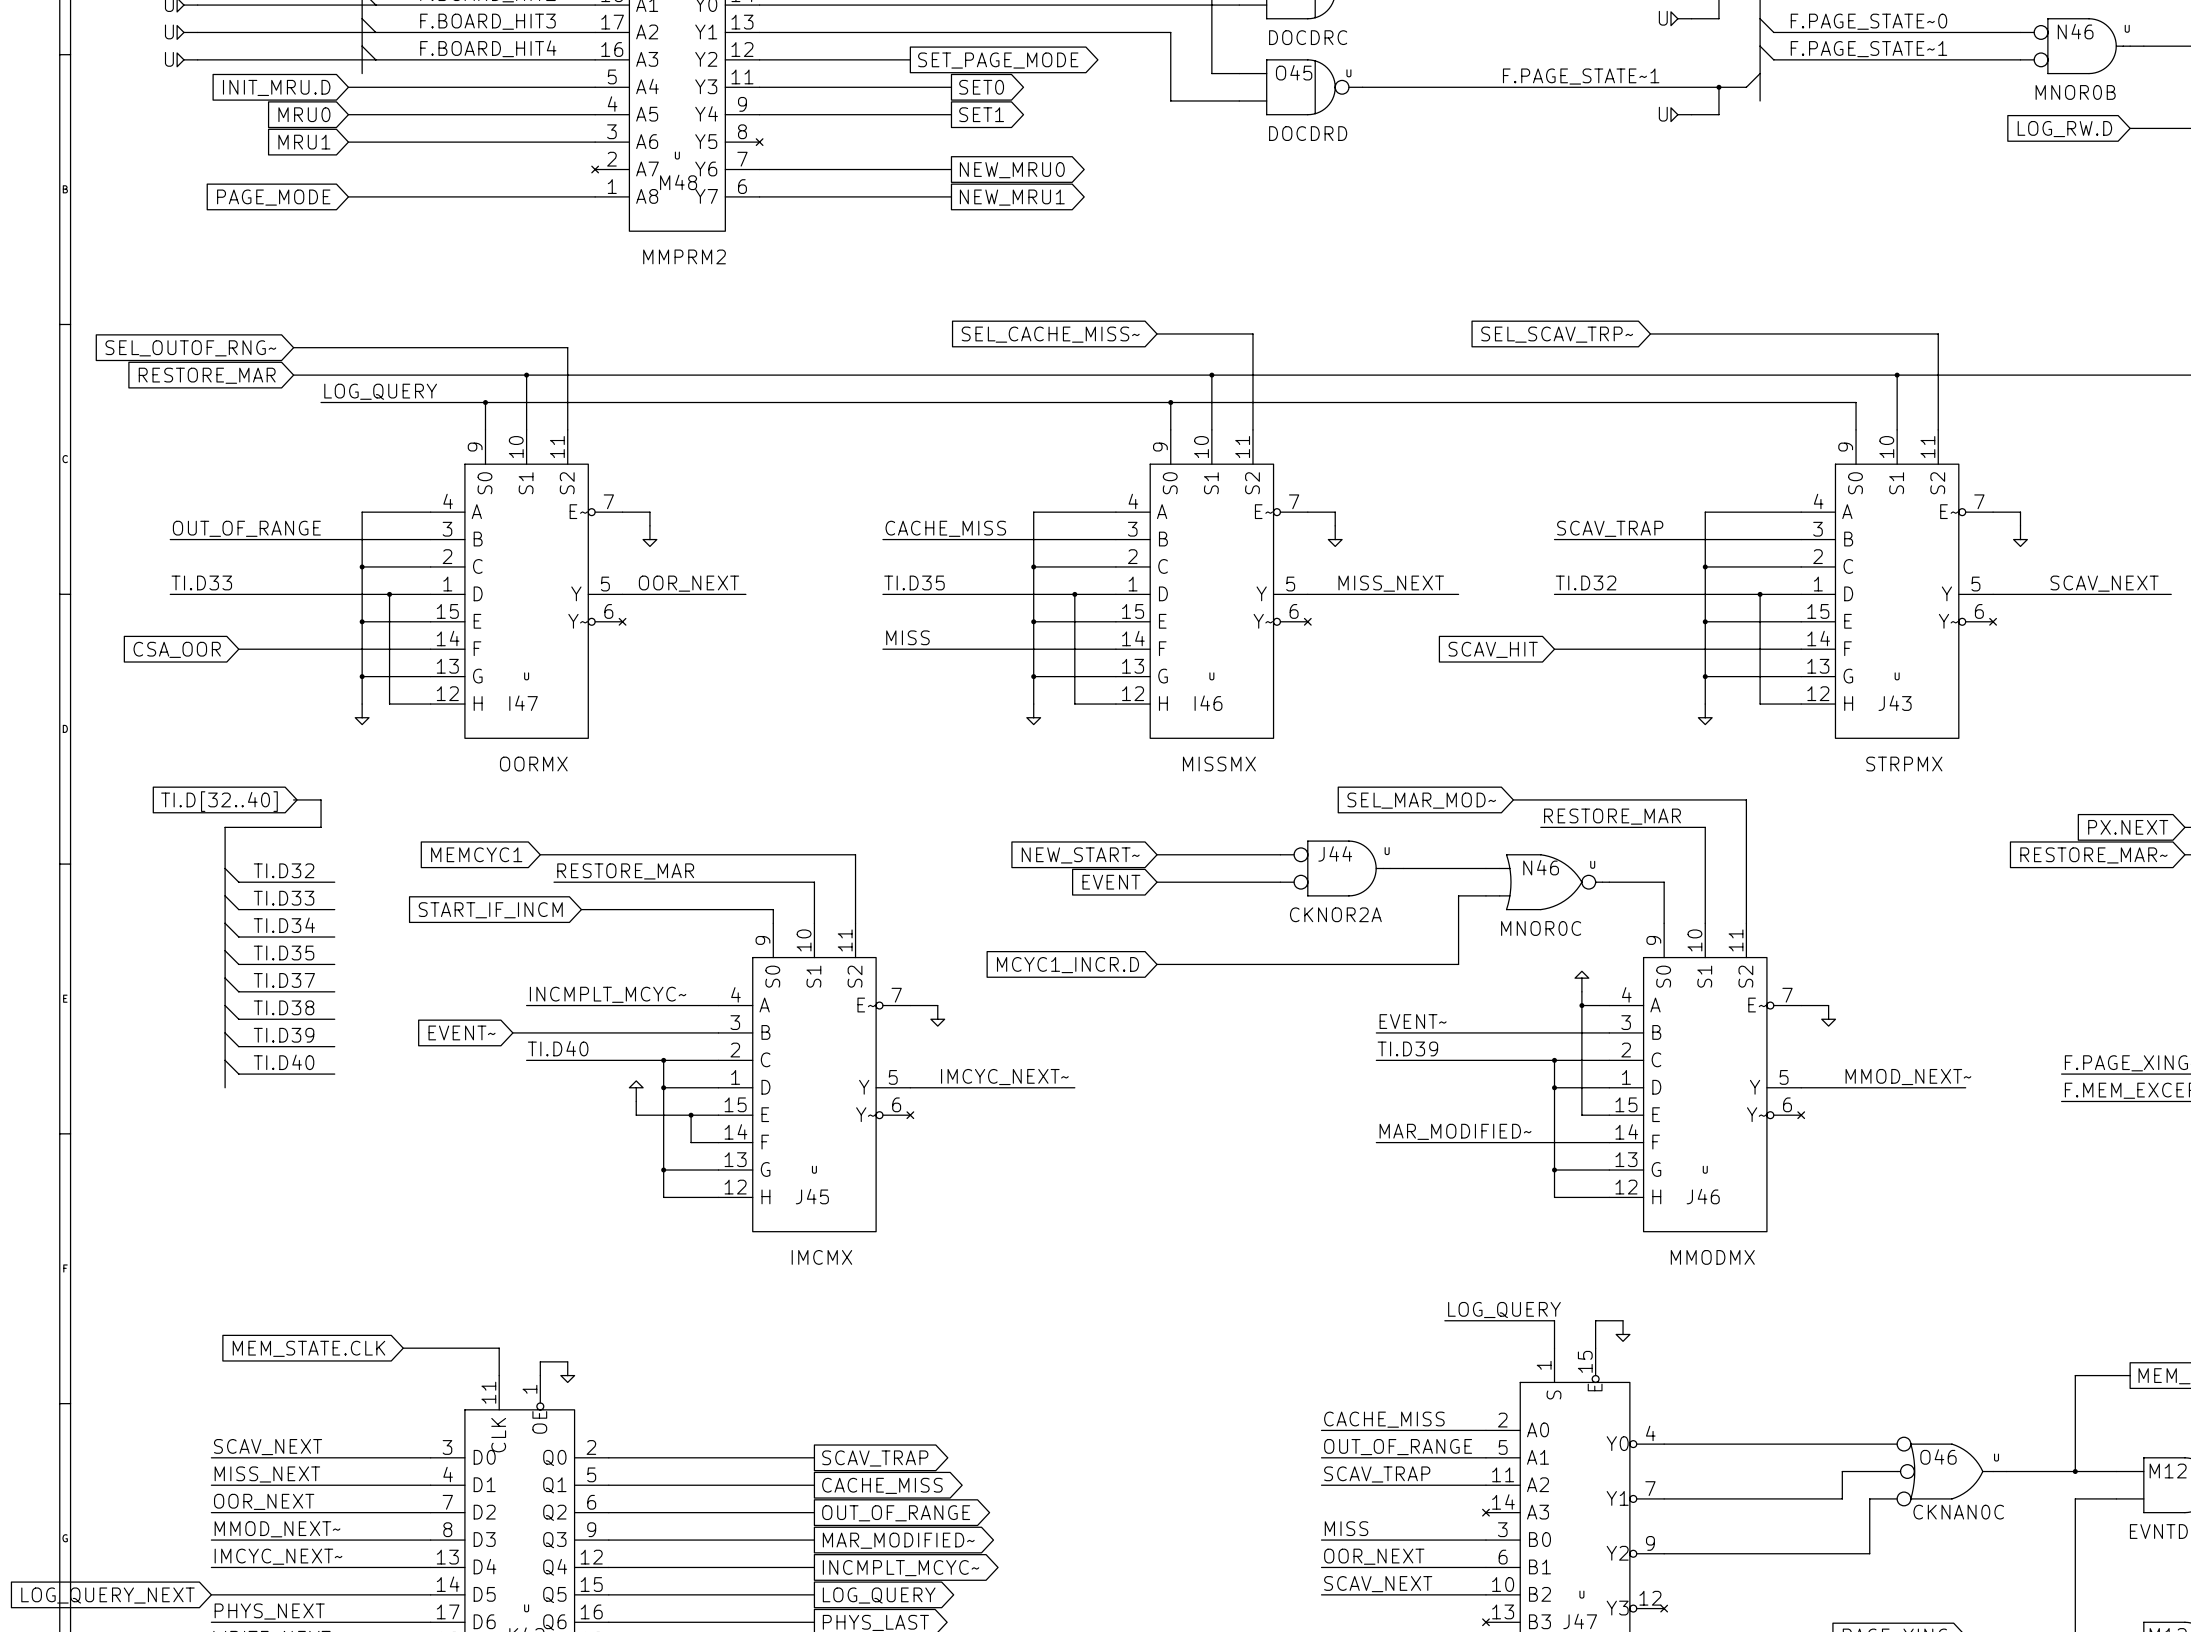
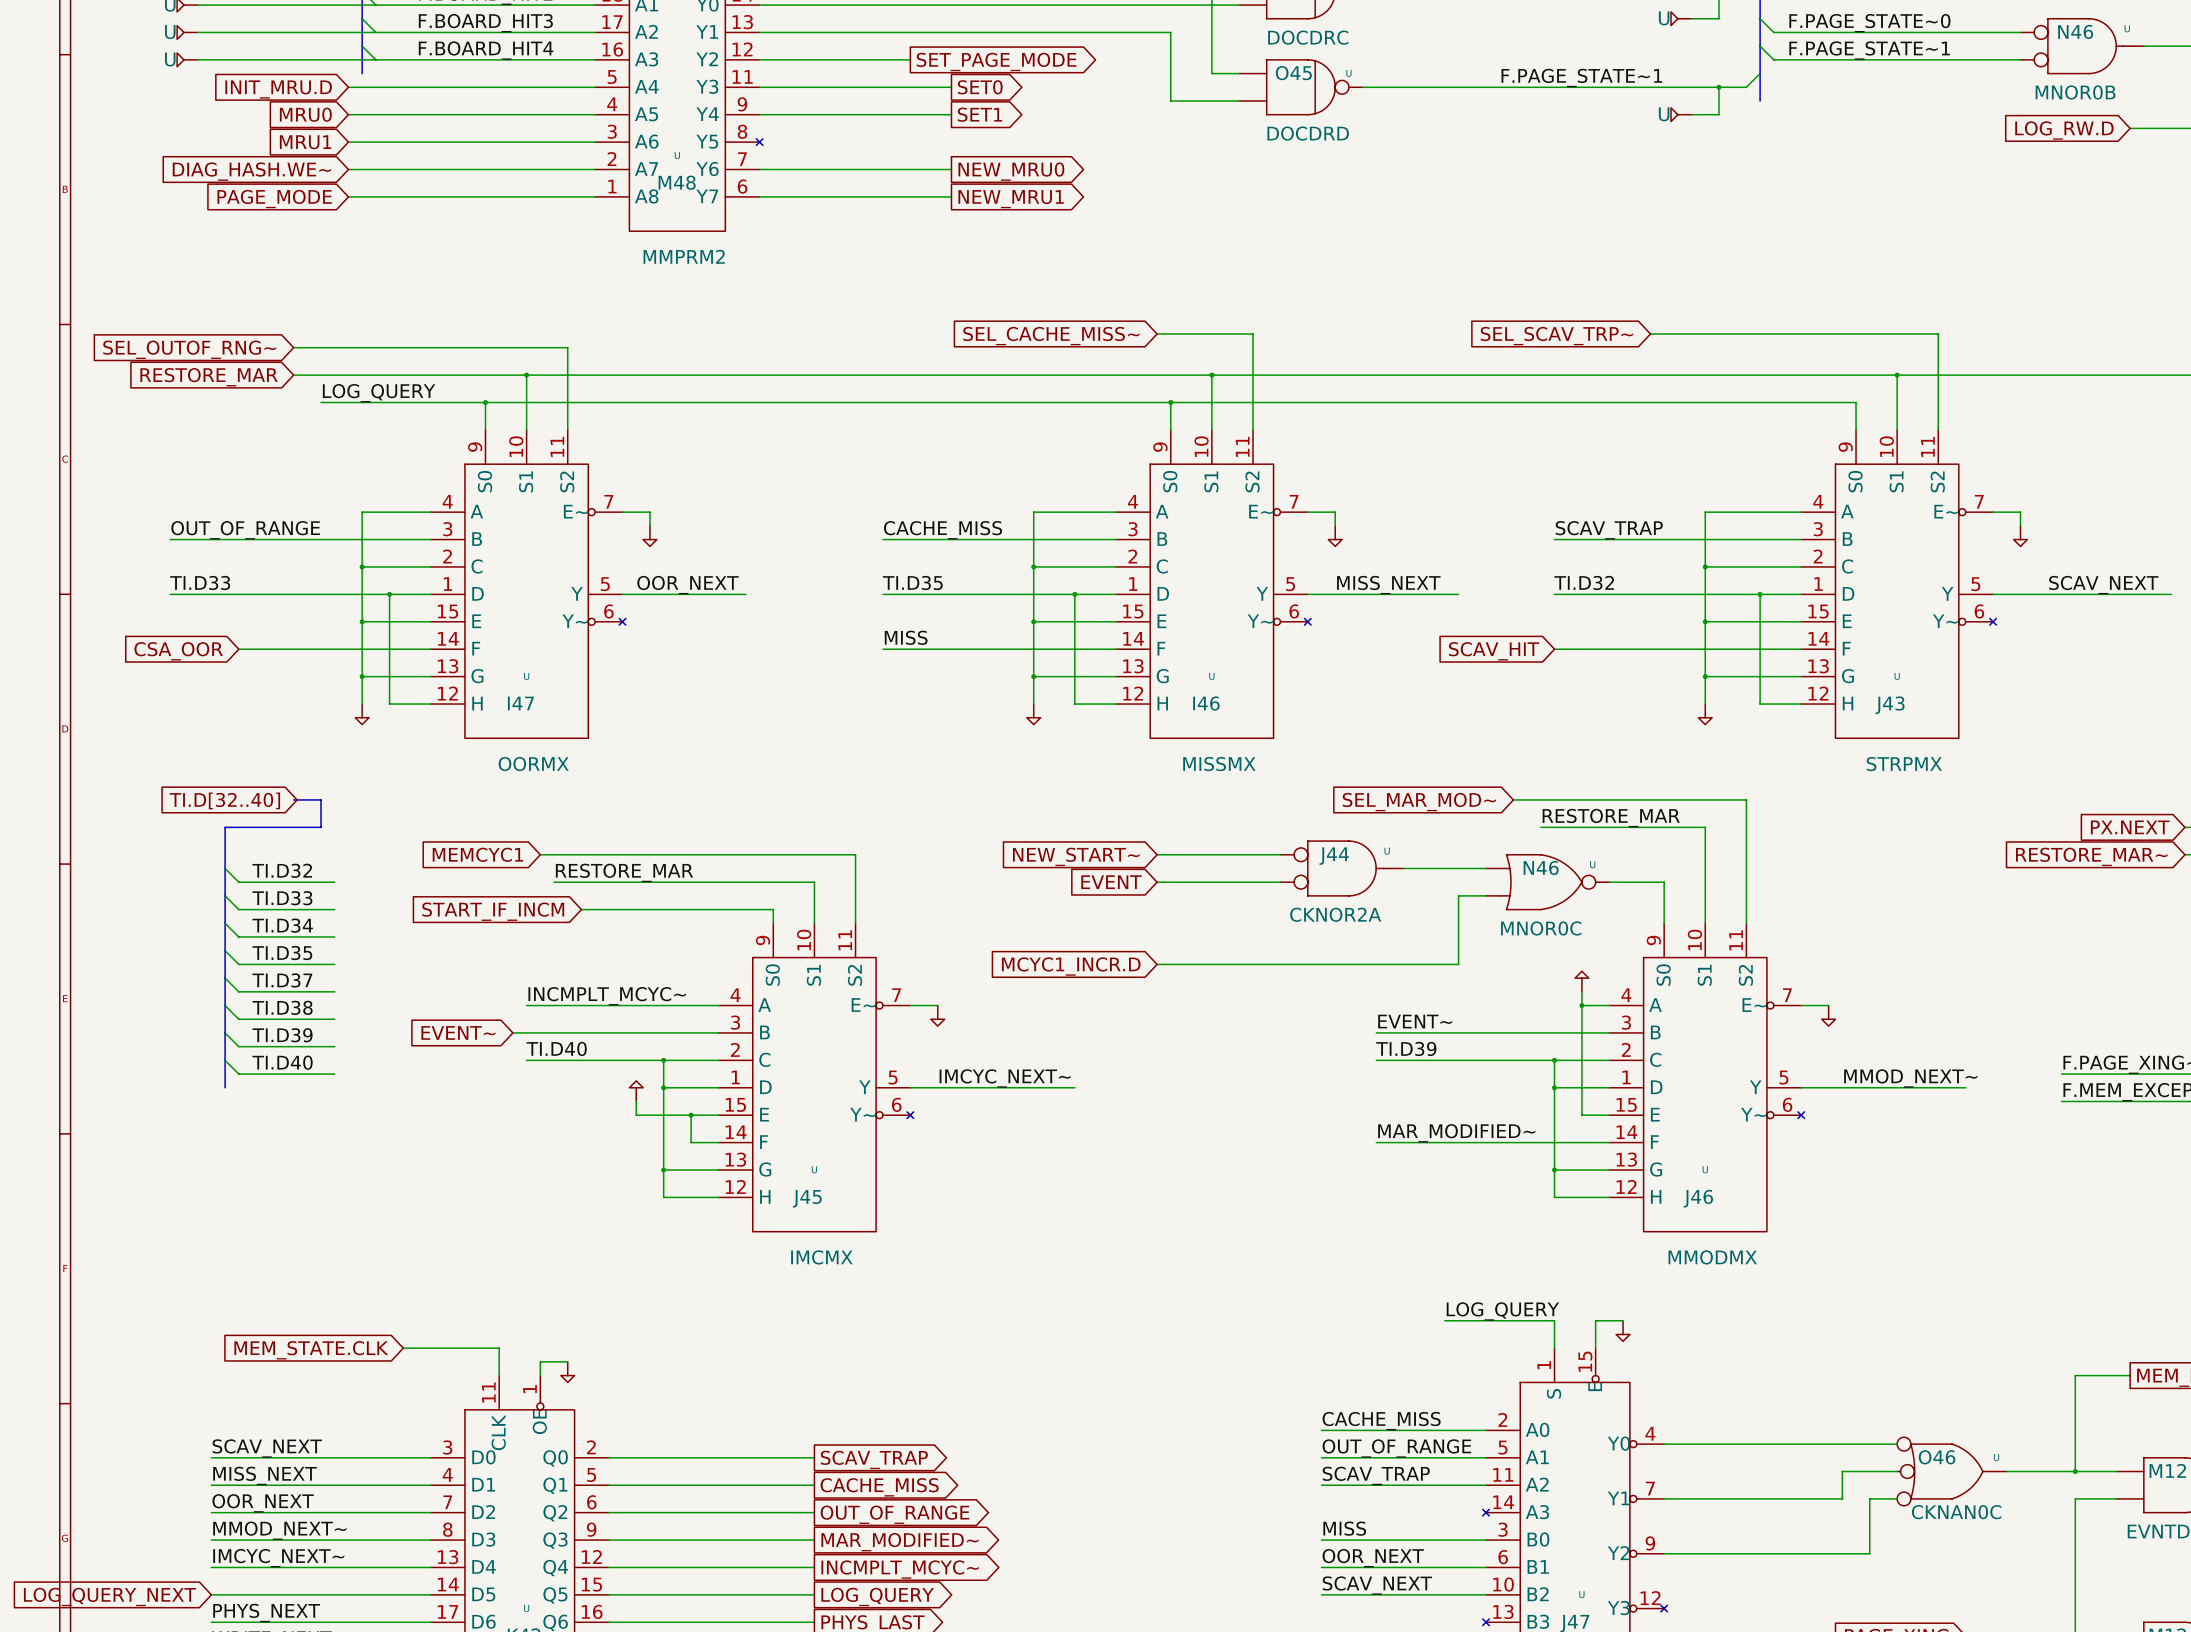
wire: none -> (348, 169) (595, 169)
no-connect mark: (595, 169) -> none
global label: none -> DIAG_HASH.WE~ (251, 171)

